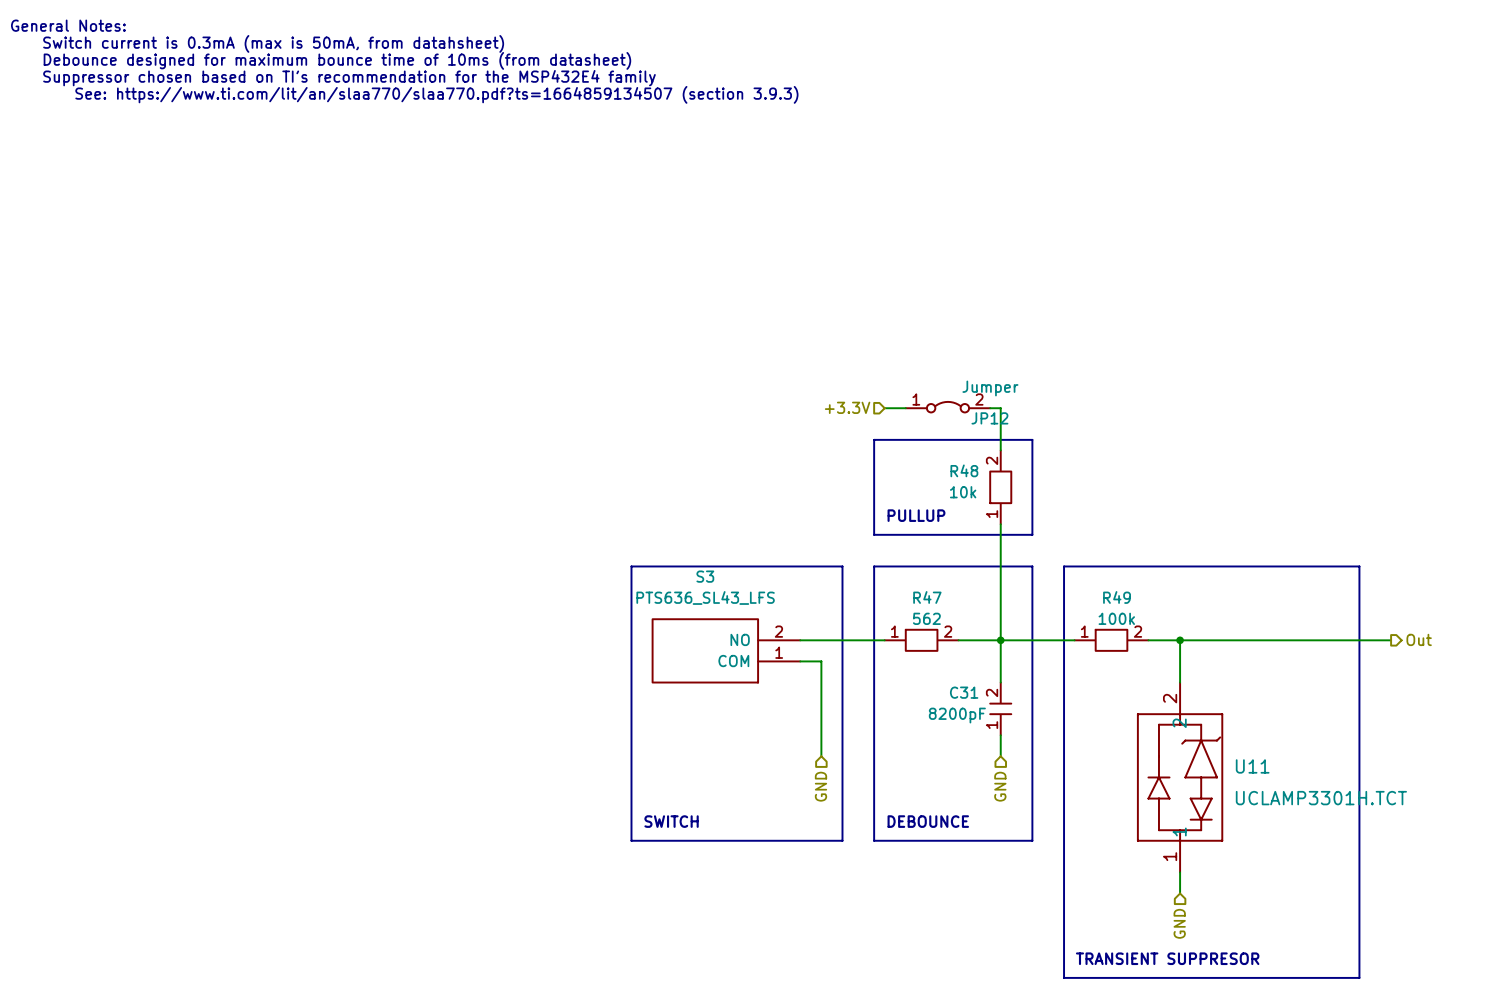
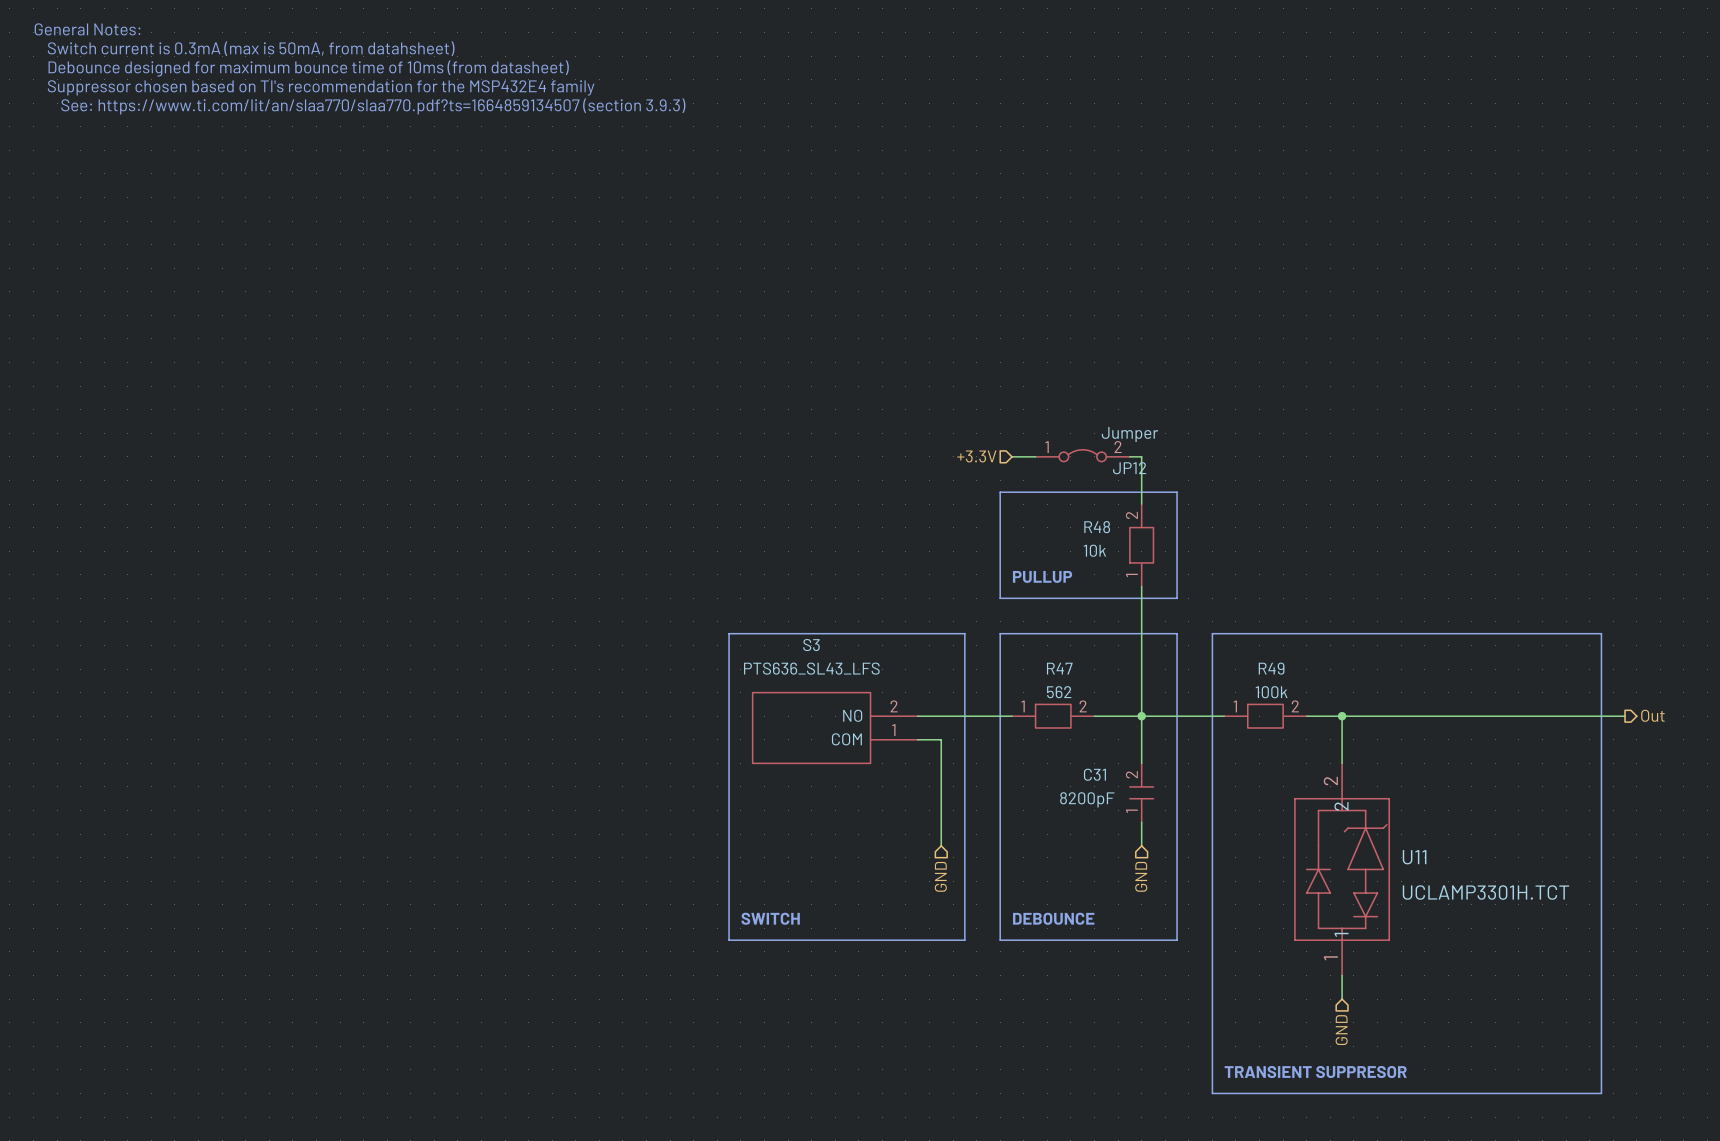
line: (1359, 566) (1359, 977) -> (1542, 633) (1601, 633) (1601, 1093) (1542, 1093)
hierarchical label position: Out (1419, 639) -> Out (1652, 715)
wire: none -> (1577, 716) (1625, 716)

